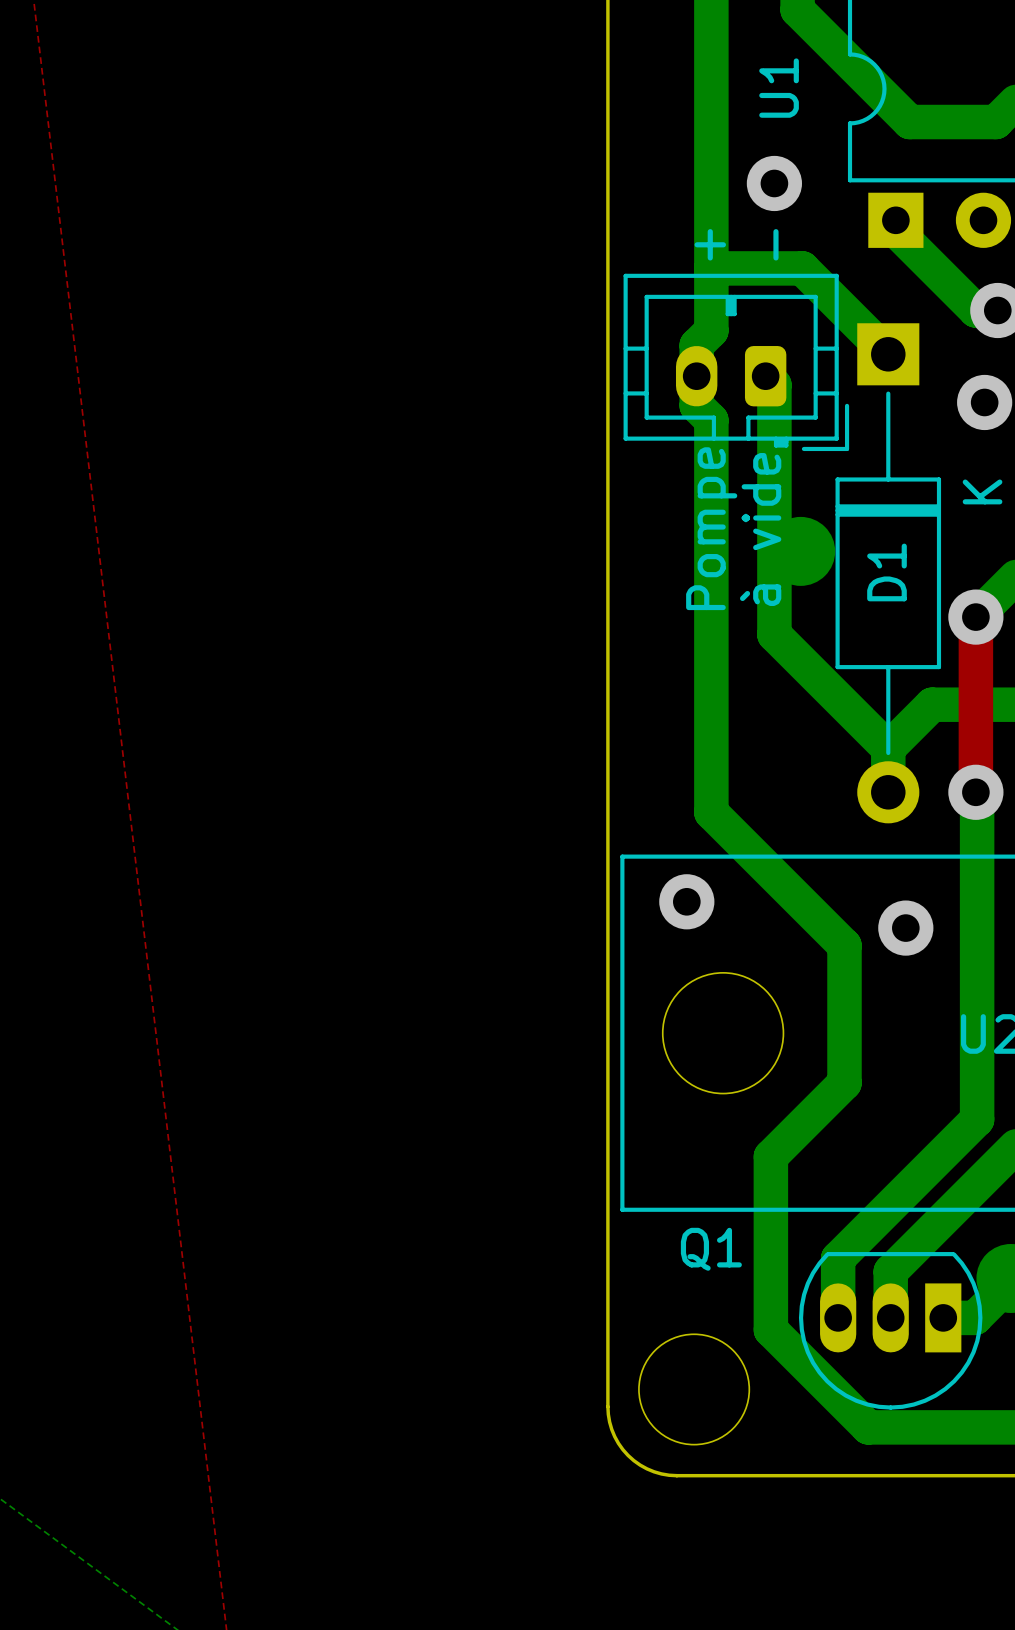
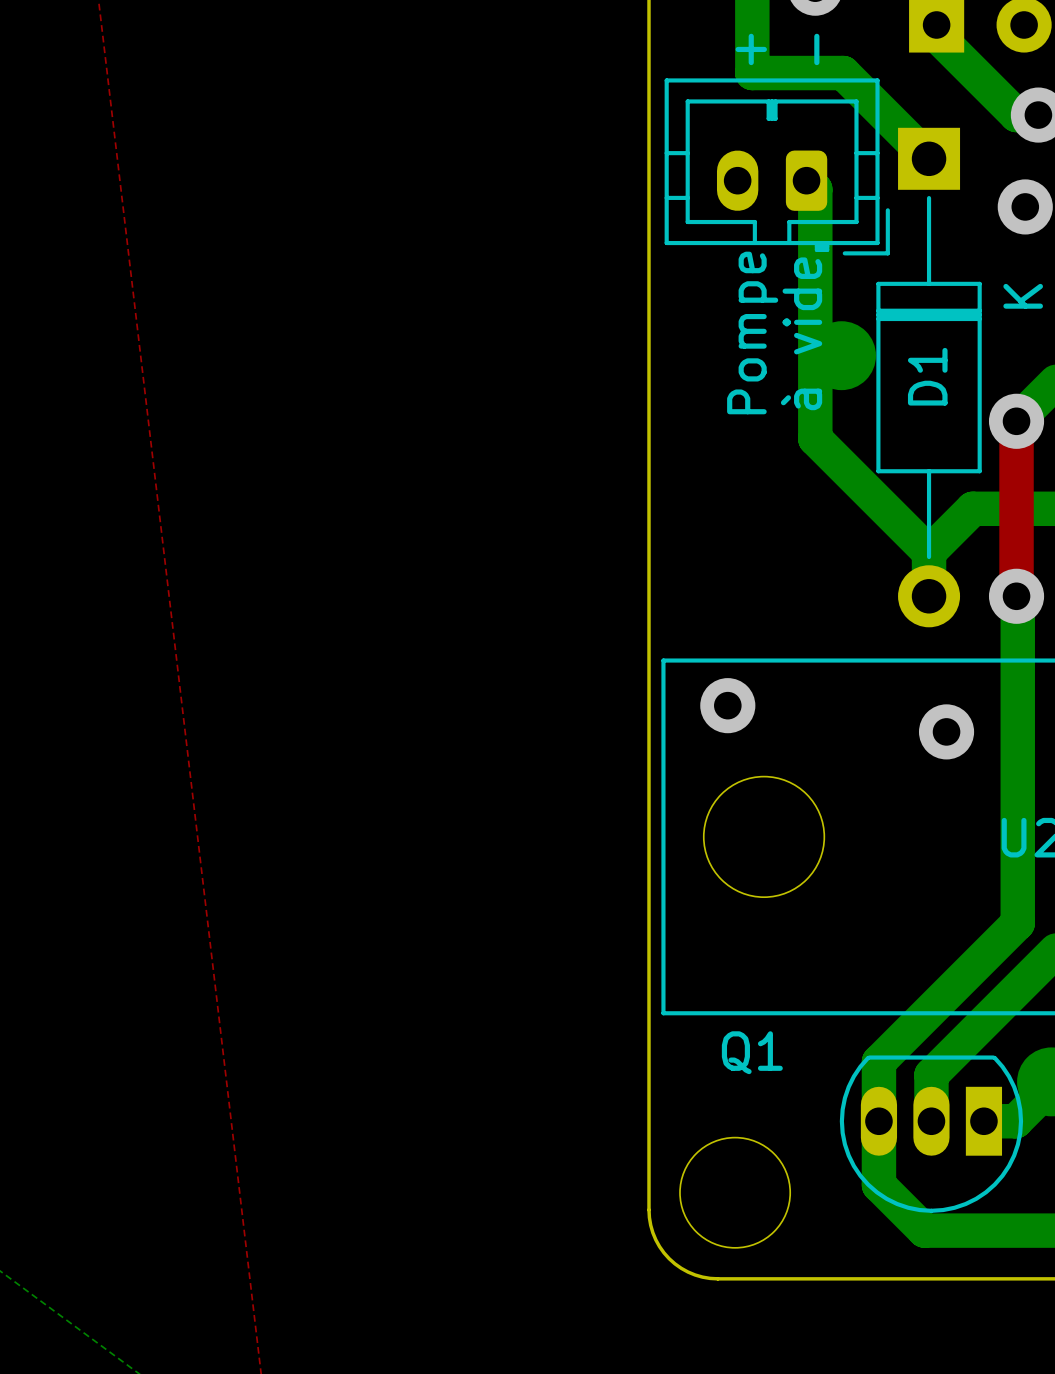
bottom track: (711, 268) (711, 330) (696, 345) (696, 405) (711, 420) (711, 812) (844, 945) (844, 1083) (770, 1156) (770, 1329) (868, 1427) (883, 1427) -> (878, 1121) (878, 1185) (924, 1230)

